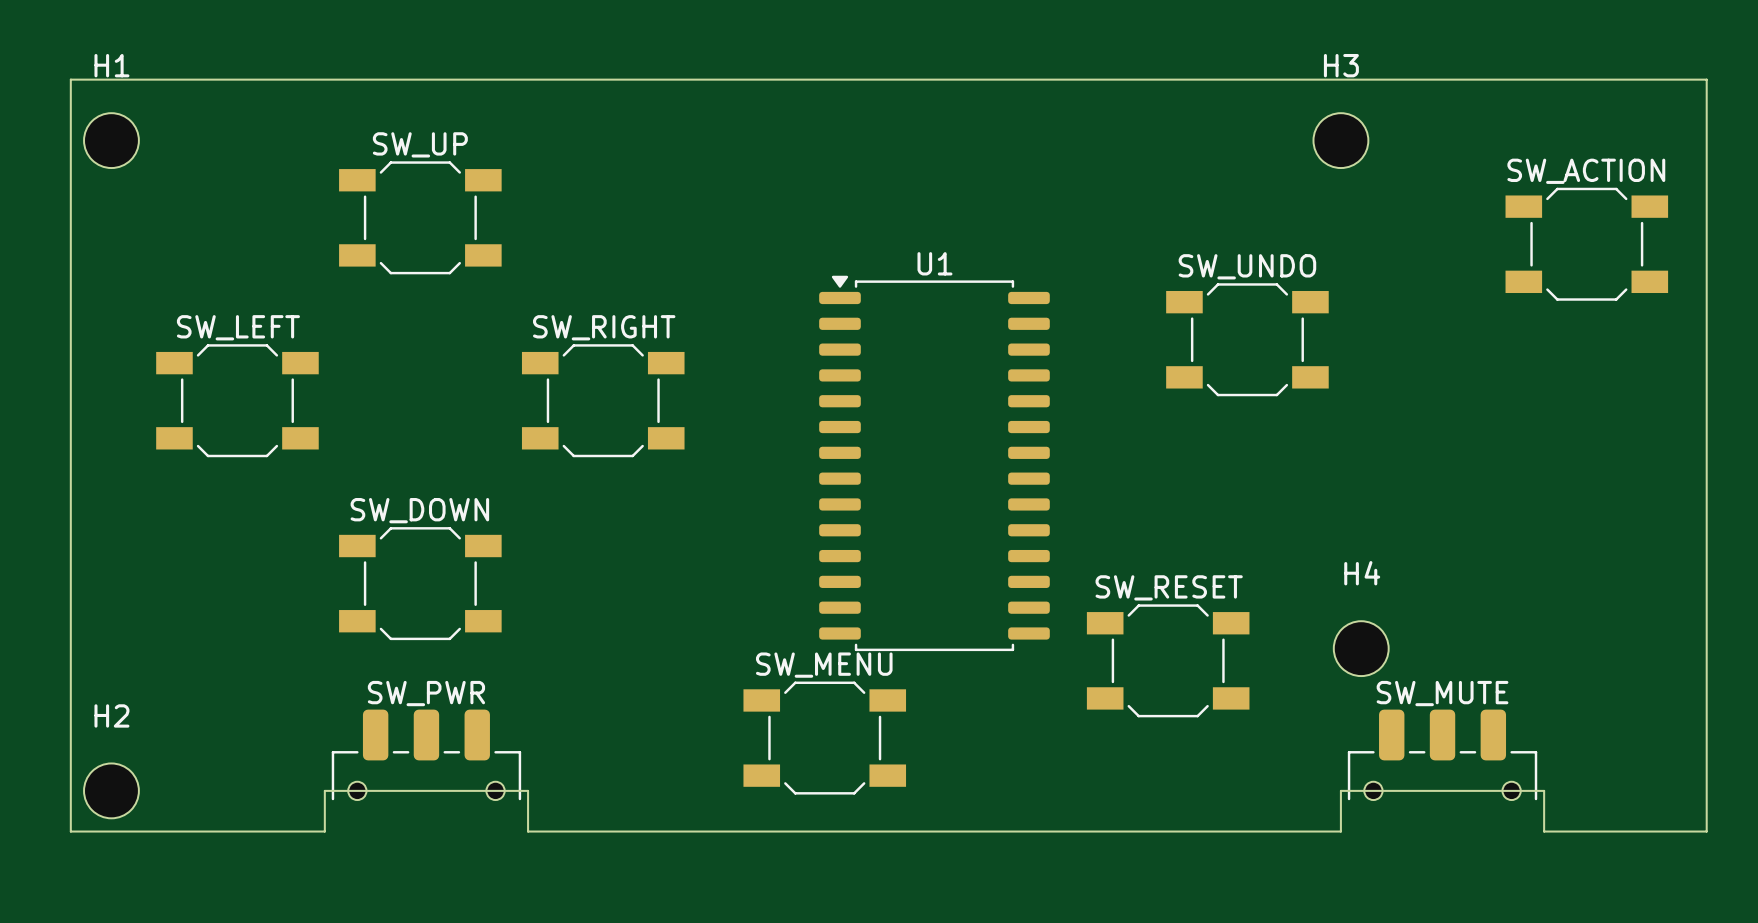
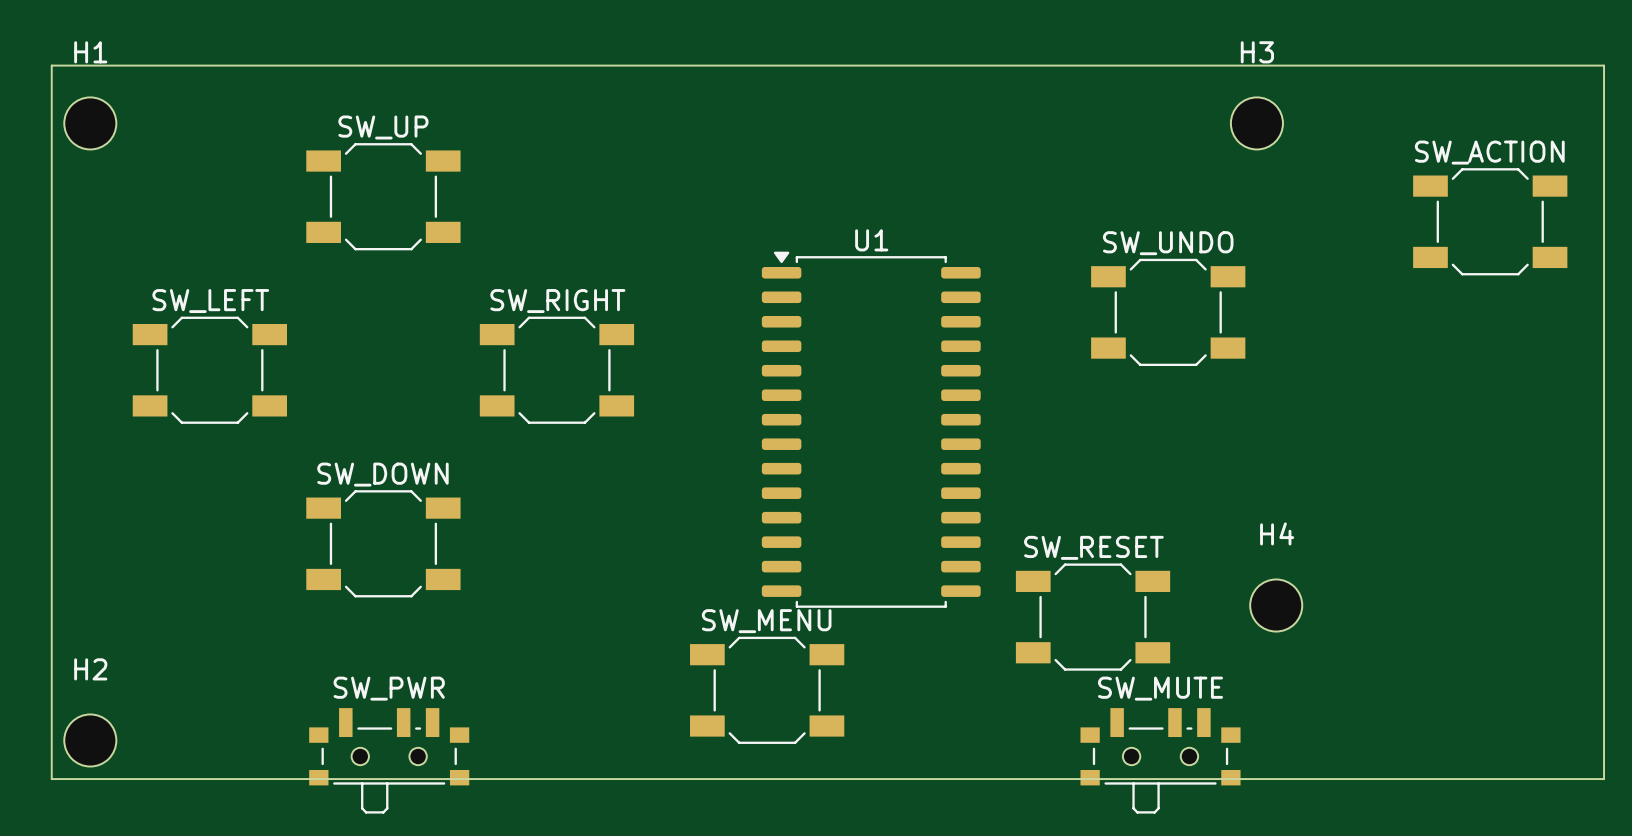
SW_PWR: (426, 754) -> none
SW_MUTE: (1442, 754) -> none
SW_PWR: none -> (389, 760)
SW_MUTE: none -> (1160, 760)
board edge: (324, 831) (324, 790) (528, 790) (528, 831) -> (292, 779) (485, 779)
board edge: (1340, 831) (1340, 790) (1544, 790) (1544, 831) -> (1256, 779) (1449, 779)

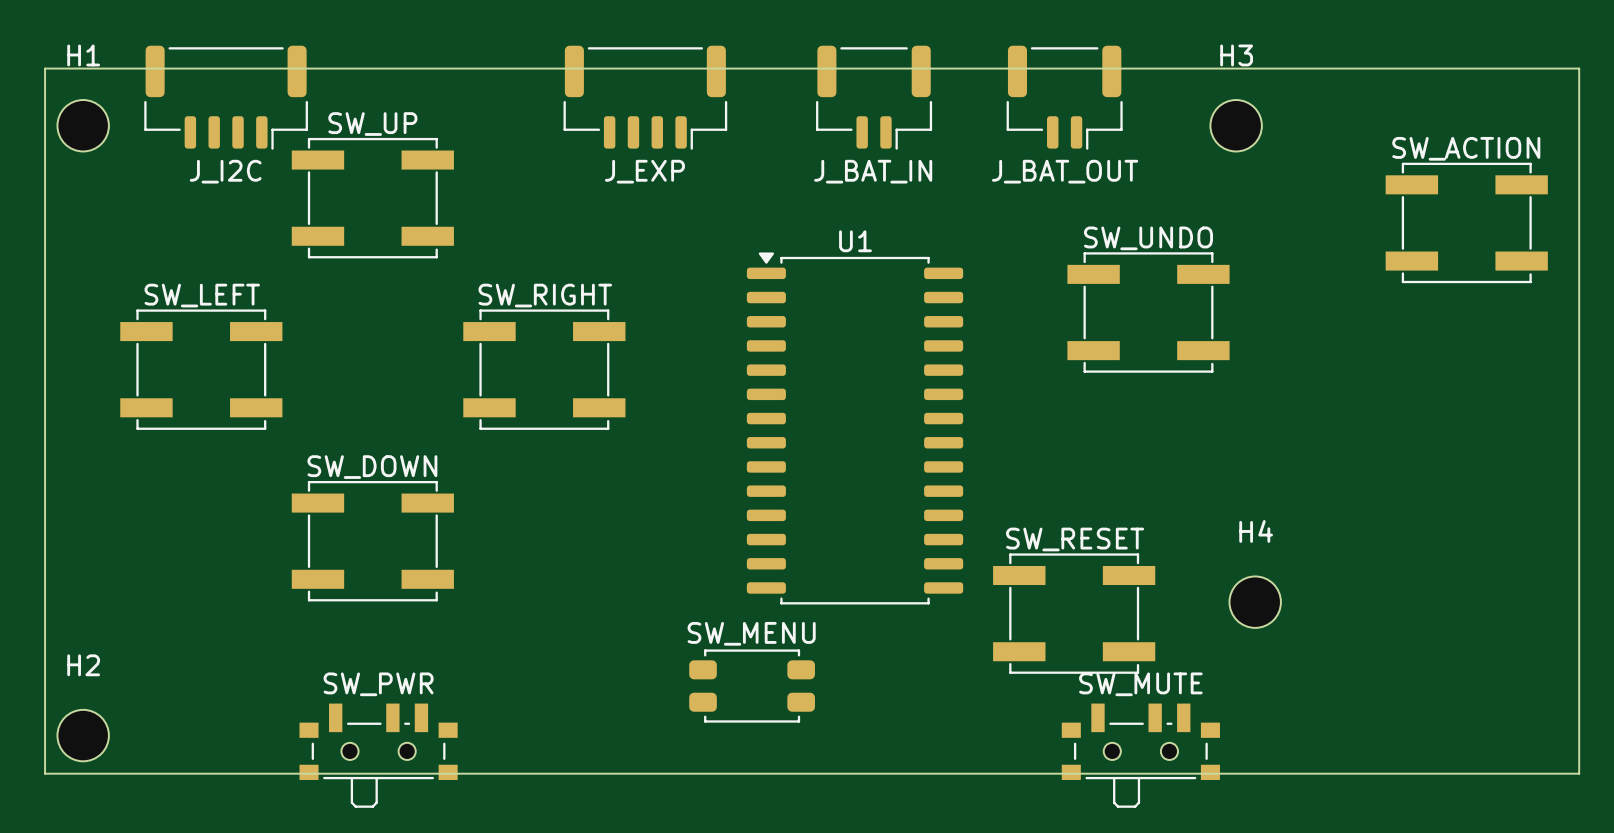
J_I2C: none -> (226, 97)
J_EXP: none -> (645, 97)
J_BAT_IN: none -> (874, 97)
J_BAT_OUT: none -> (1064, 97)
SW_UP footprint: [306, 143, 461, 251] -> [291, 137, 454, 259]
SW_ACTION footprint: [1413, 168, 1568, 276] -> [1385, 162, 1548, 284]
SW_UNDO footprint: [1091, 258, 1246, 367] -> [1067, 252, 1230, 373]
SW_LEFT footprint: [132, 316, 288, 424] -> [120, 309, 283, 430]
SW_RIGHT footprint: [479, 316, 635, 424] -> [463, 309, 626, 430]
SW_DOWN footprint: [306, 490, 461, 598] -> [291, 480, 454, 602]
SW_RESET footprint: [1015, 563, 1171, 671] -> [993, 553, 1156, 674]
SW_MENU footprint: [690, 636, 845, 744] -> [689, 649, 815, 723]

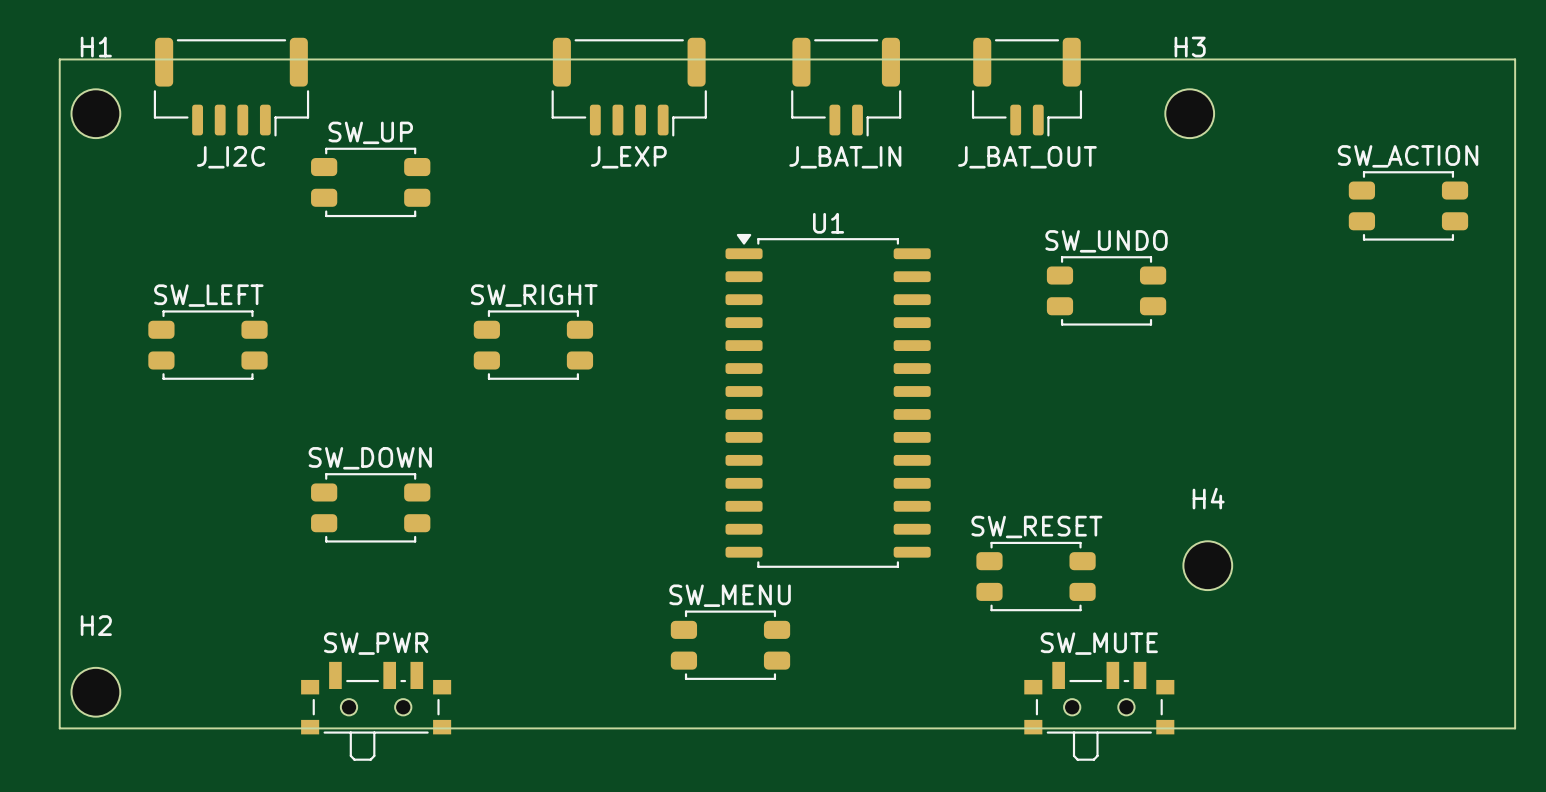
SW_UP footprint: [291, 137, 454, 259] -> [311, 147, 431, 218]
SW_ACTION footprint: [1385, 162, 1548, 284] -> [1348, 171, 1469, 241]
SW_UNDO footprint: [1067, 252, 1230, 373] -> [1046, 256, 1167, 326]
SW_LEFT footprint: [120, 309, 283, 430] -> [148, 310, 268, 380]
SW_RIGHT footprint: [463, 309, 626, 430] -> [473, 310, 594, 380]
SW_DOWN footprint: [291, 480, 454, 602] -> [311, 473, 431, 543]
SW_RESET footprint: [993, 553, 1156, 674] -> [976, 541, 1096, 612]

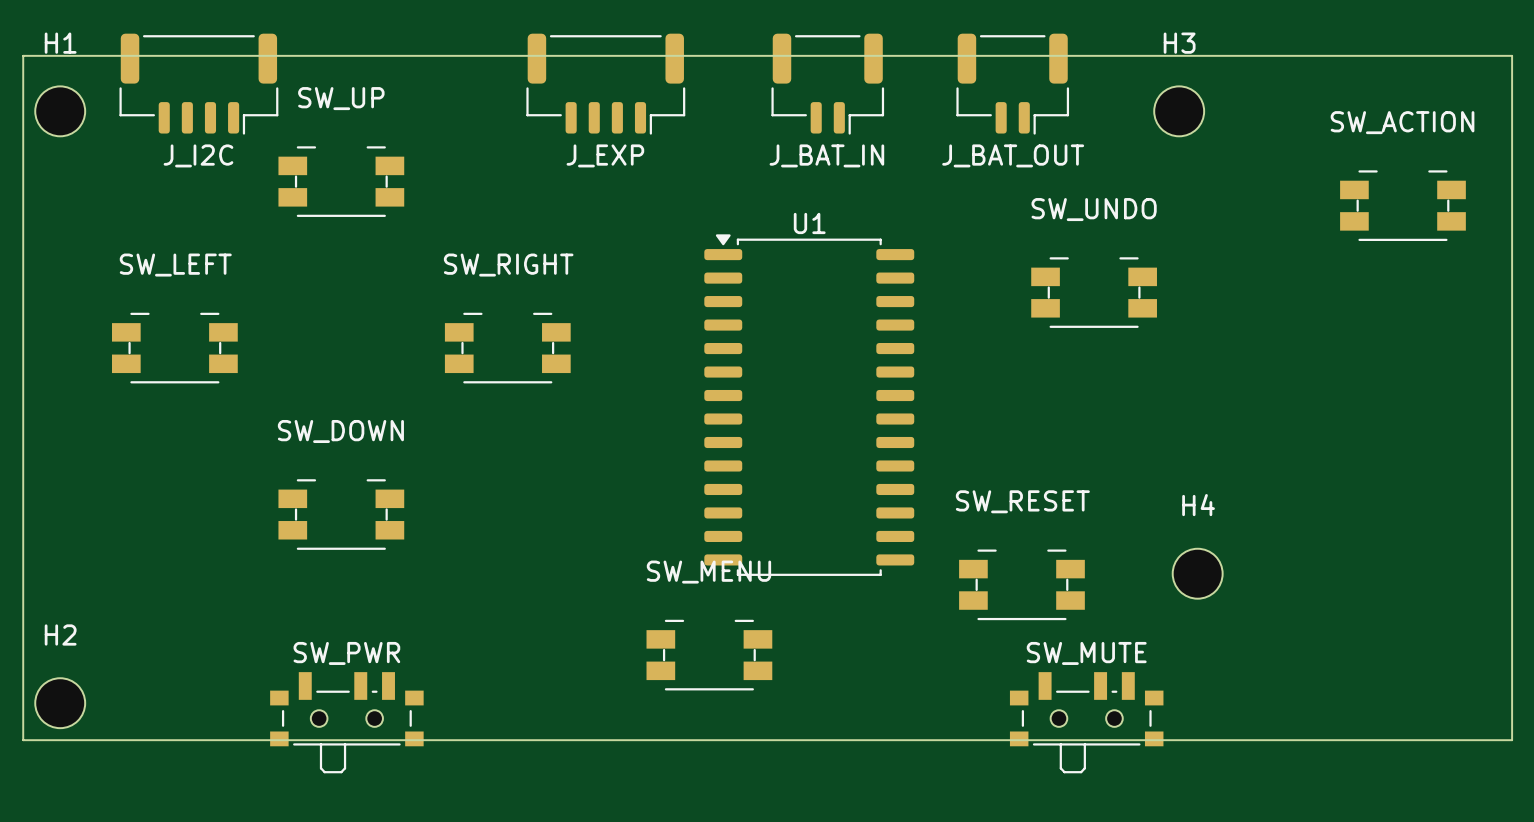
SW_UP footprint: [311, 147, 431, 218] -> [278, 146, 405, 217]
SW_ACTION footprint: [1348, 171, 1469, 241] -> [1340, 170, 1466, 241]
SW_UNDO footprint: [1046, 256, 1167, 326] -> [1031, 257, 1157, 328]
SW_LEFT footprint: [148, 310, 268, 380] -> [111, 312, 238, 384]
SW_RIGHT footprint: [473, 310, 594, 380] -> [444, 312, 571, 384]
SW_DOWN footprint: [311, 473, 431, 543] -> [278, 479, 405, 550]
SW_RESET footprint: [976, 541, 1096, 612] -> [959, 549, 1085, 621]
SW_MENU footprint: [670, 610, 791, 680] -> [646, 619, 773, 691]

